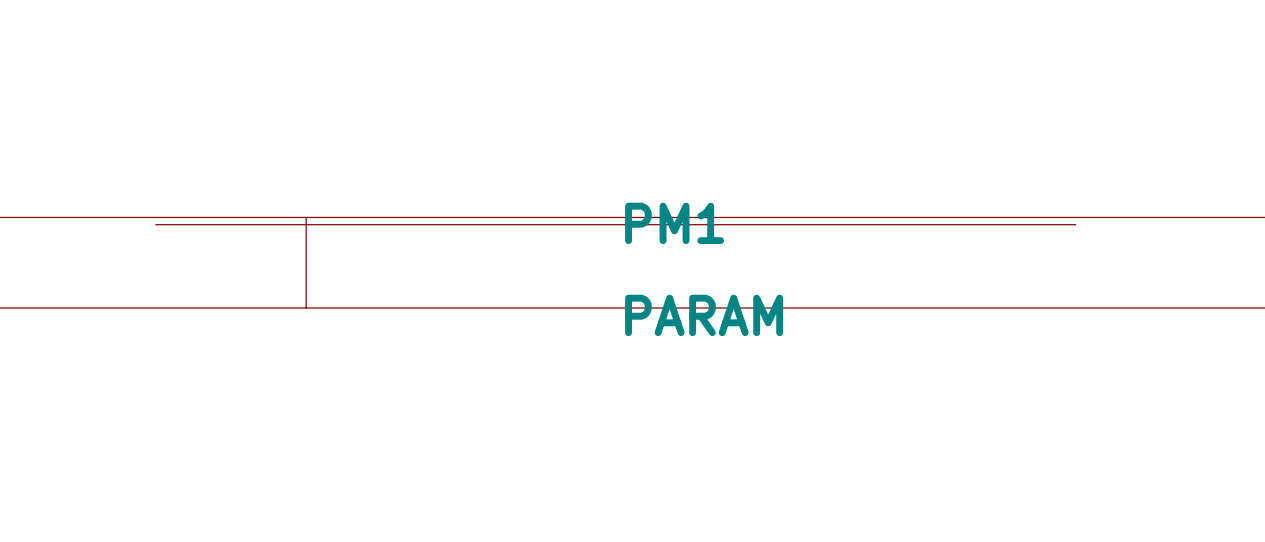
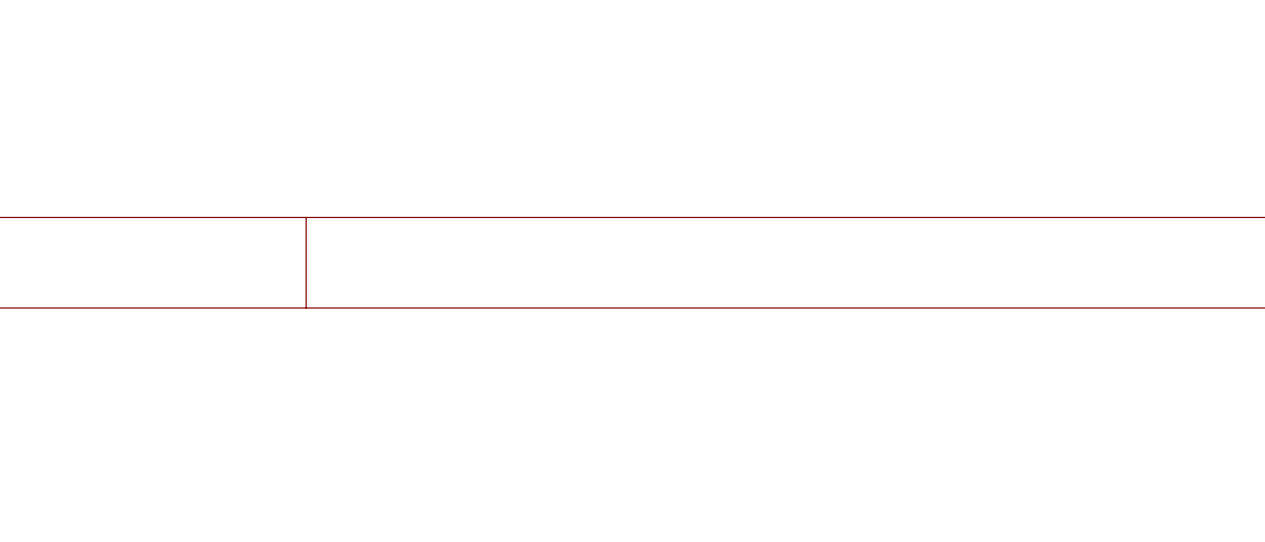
PM1: PARAM (615, 224) -> none

